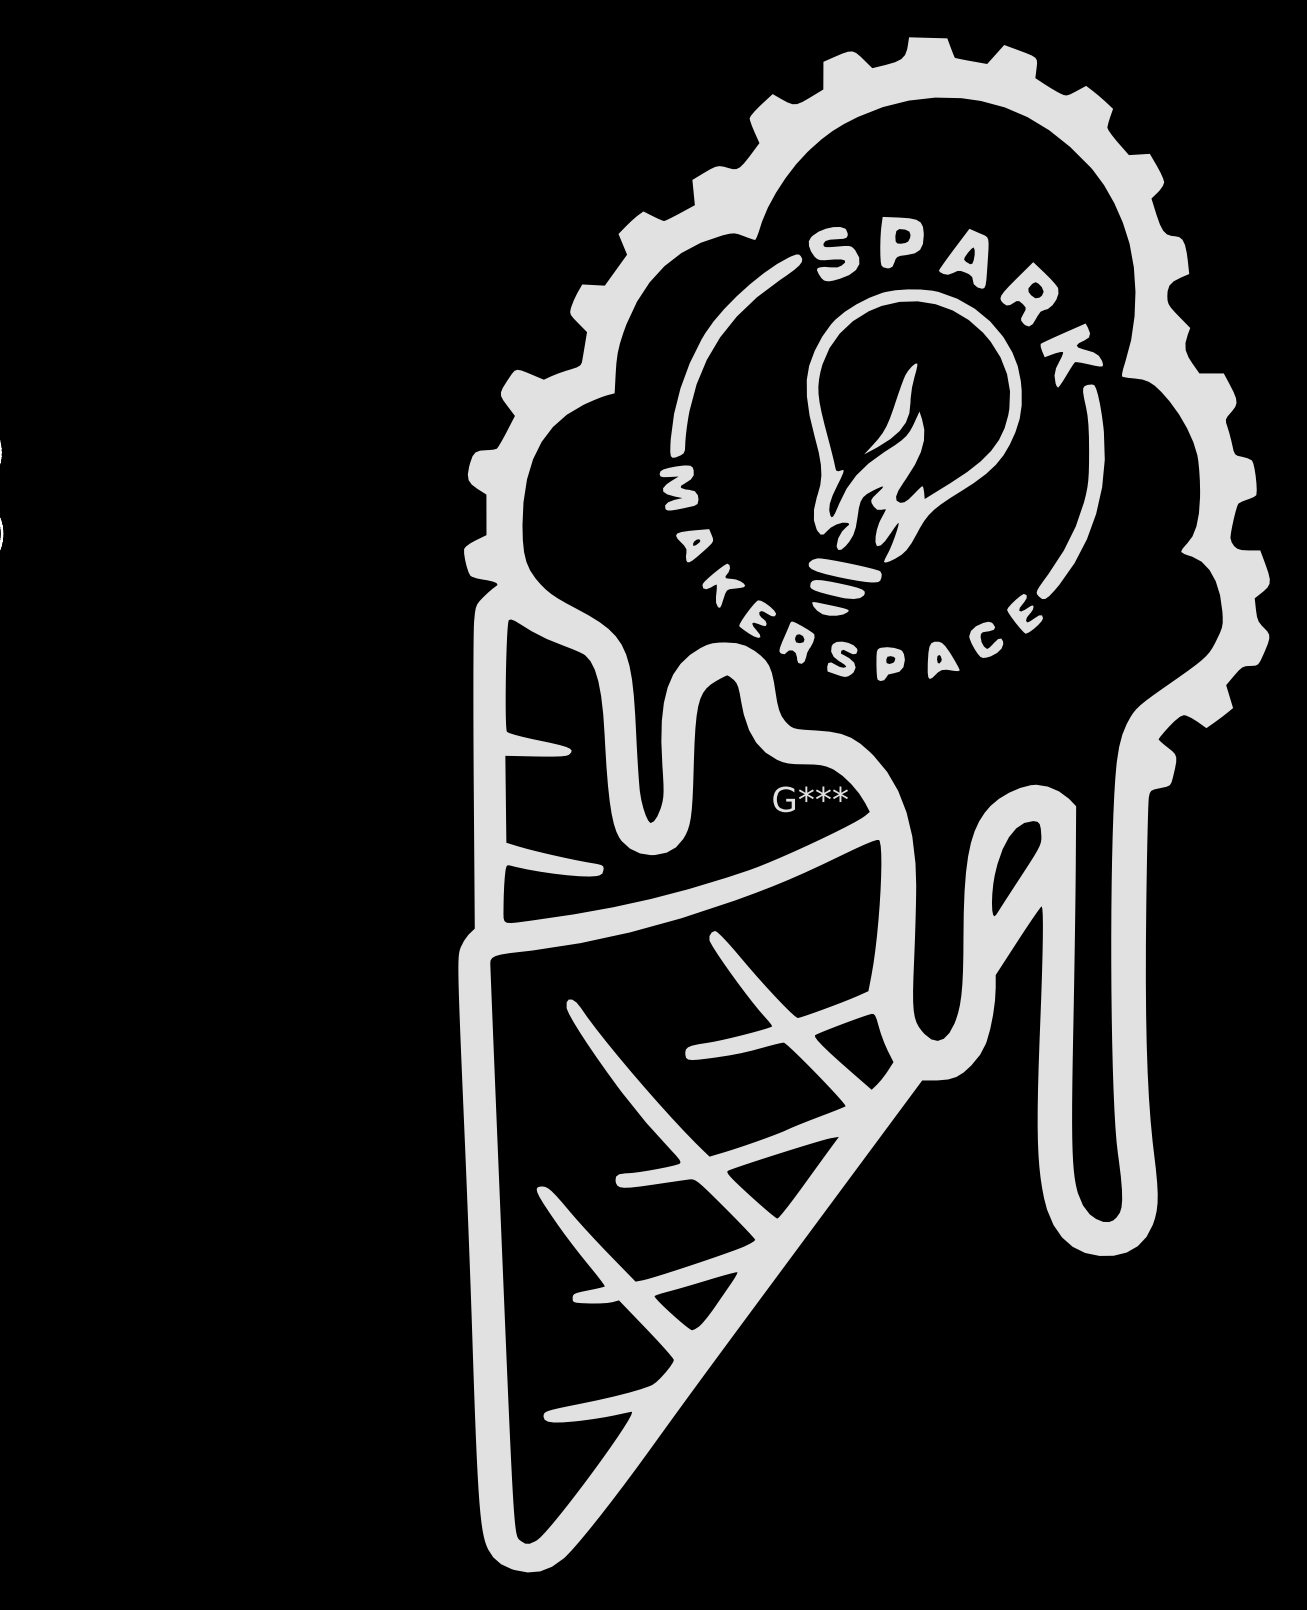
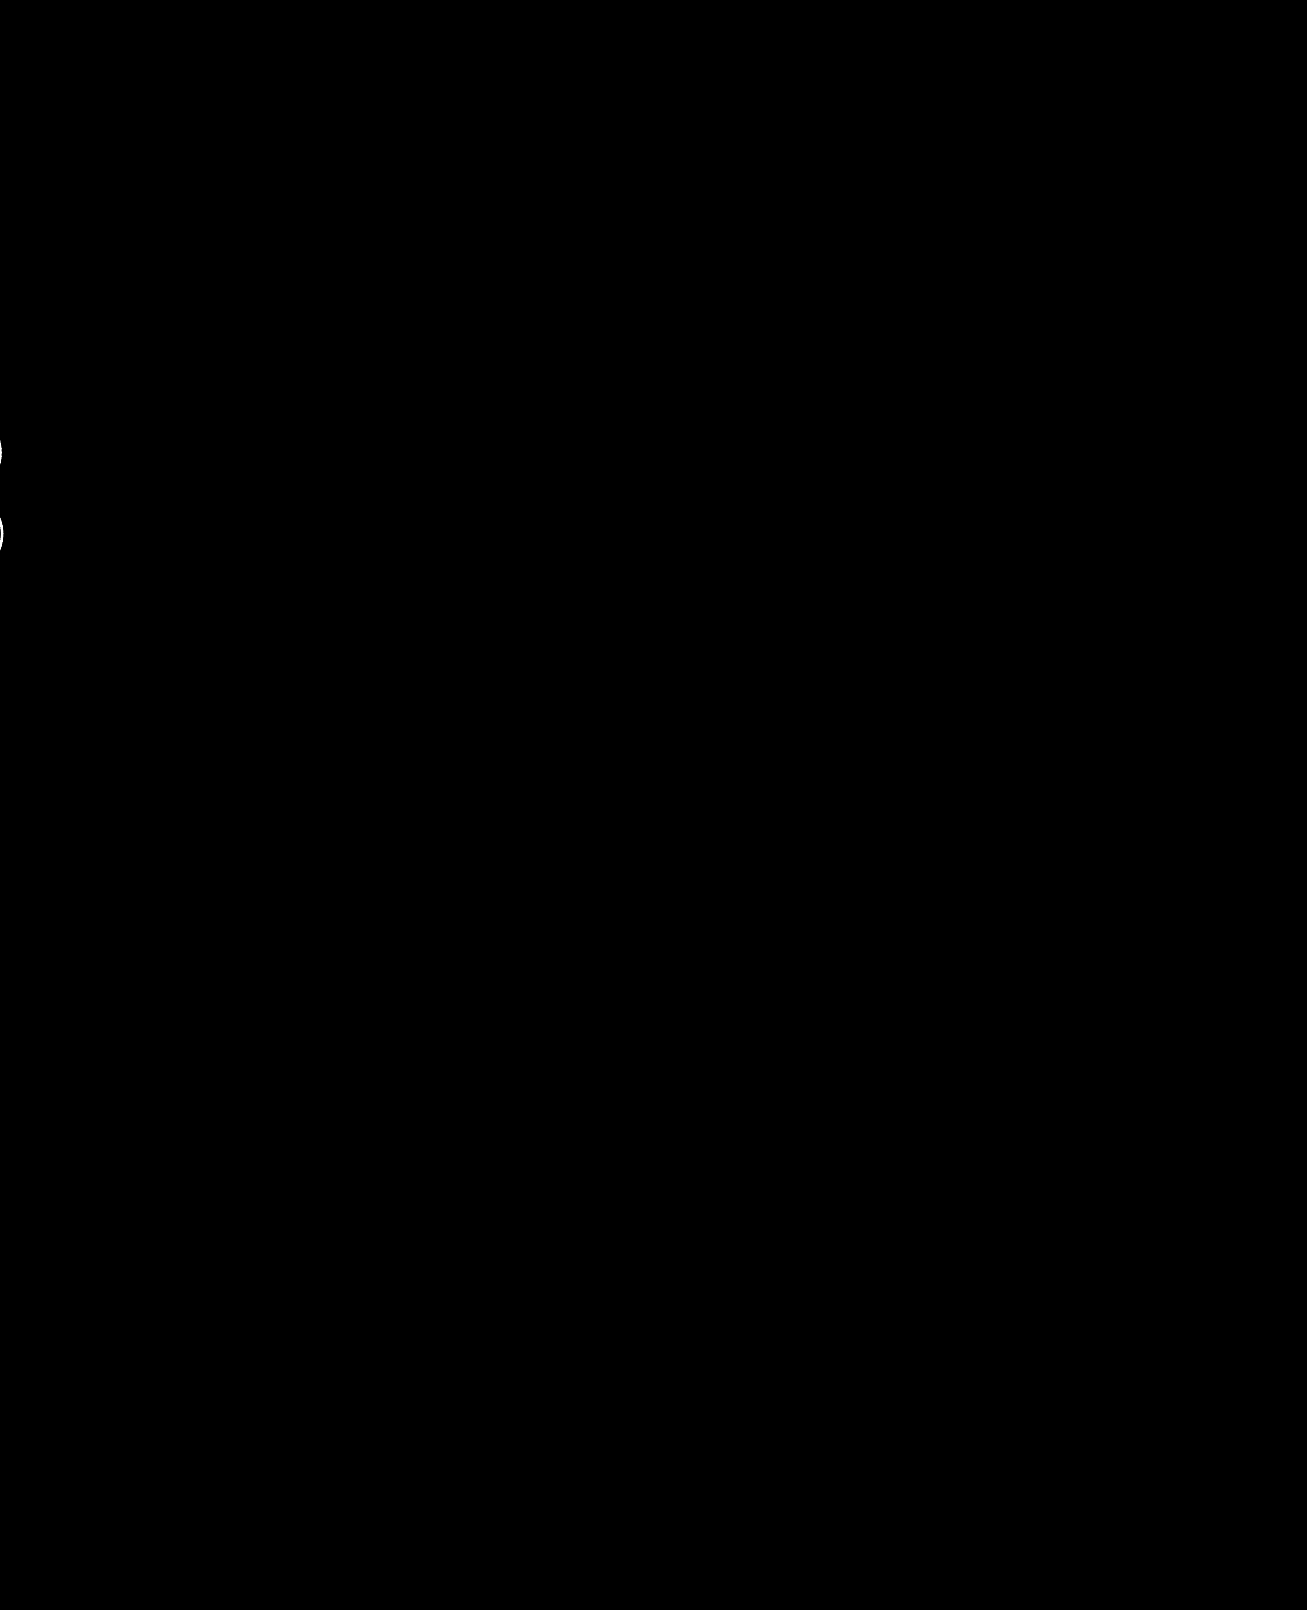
G***: (864, 804) -> none

